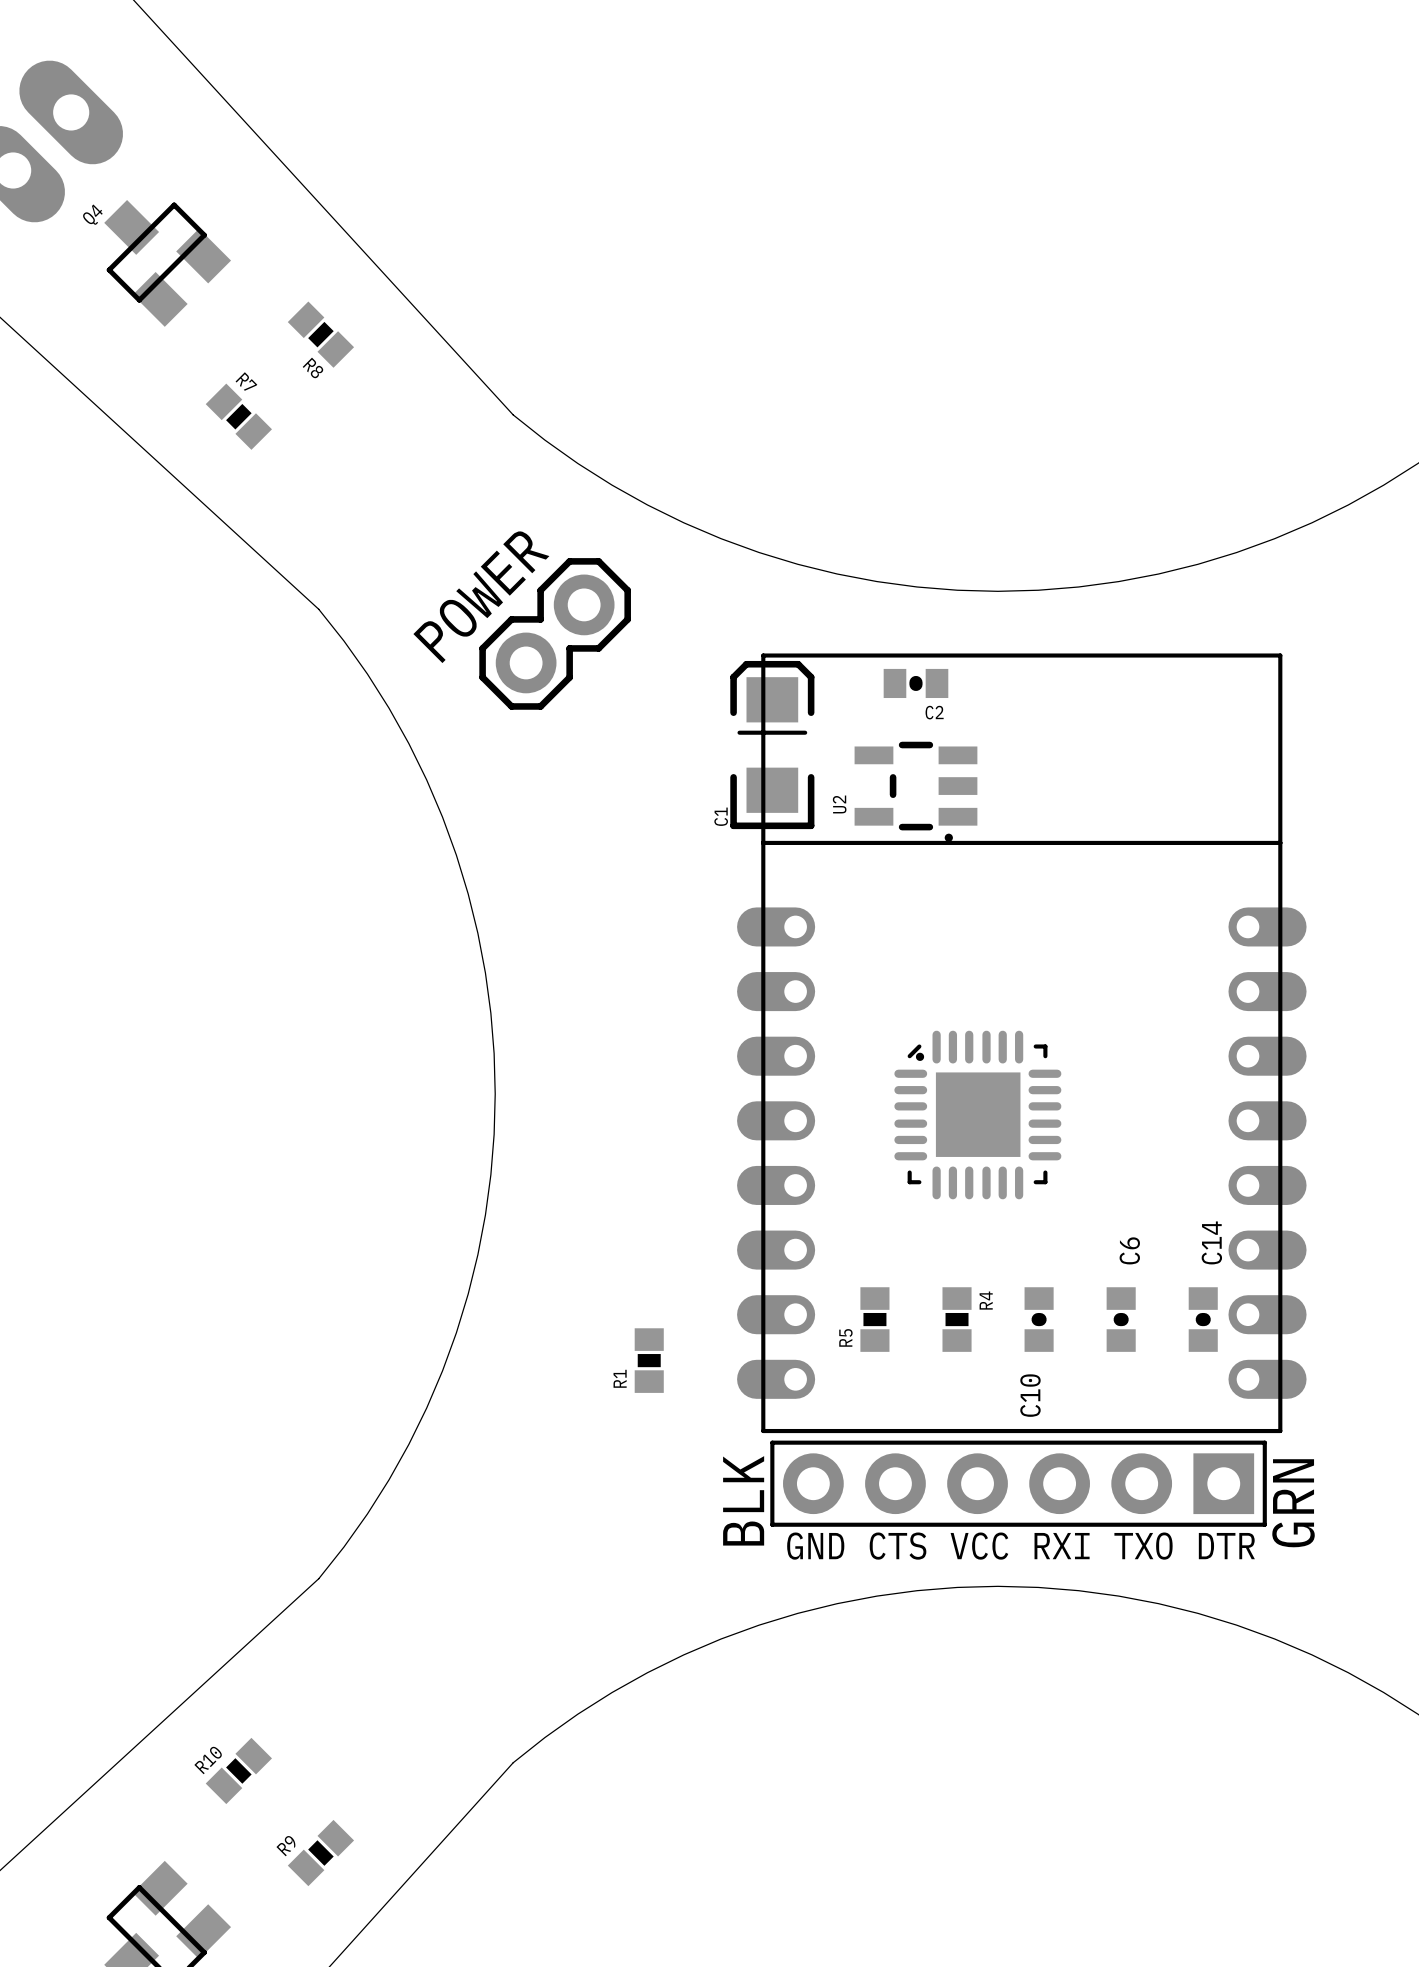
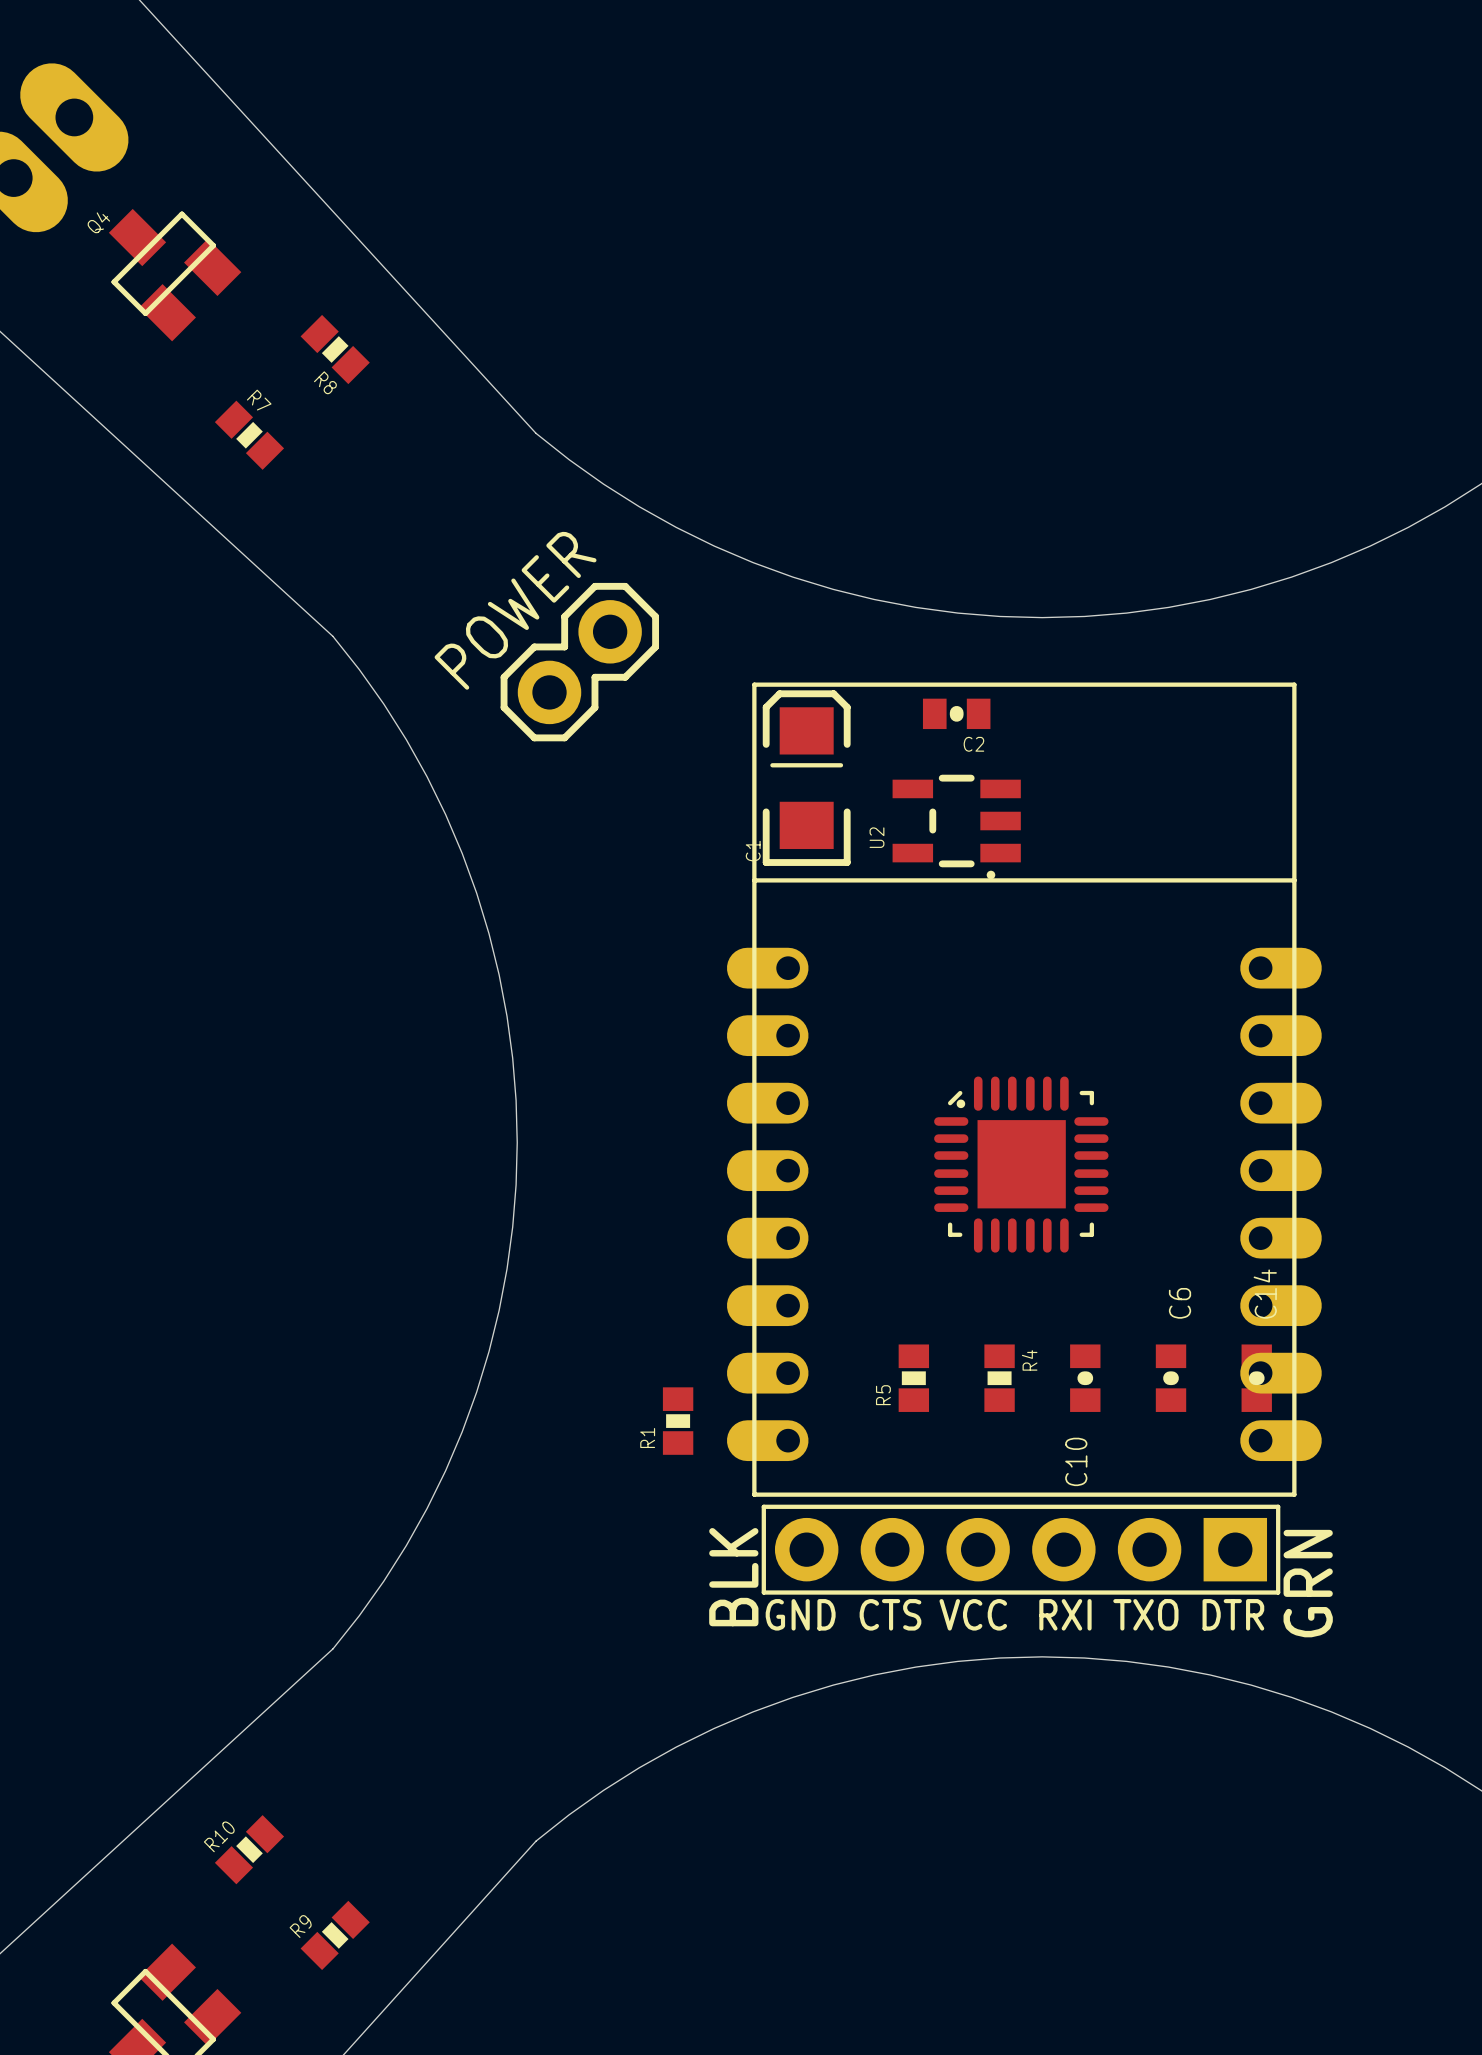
part position: (1021, 1043) -> (1024, 1089)
part position: (1018, 1483) -> (1020, 1549)

